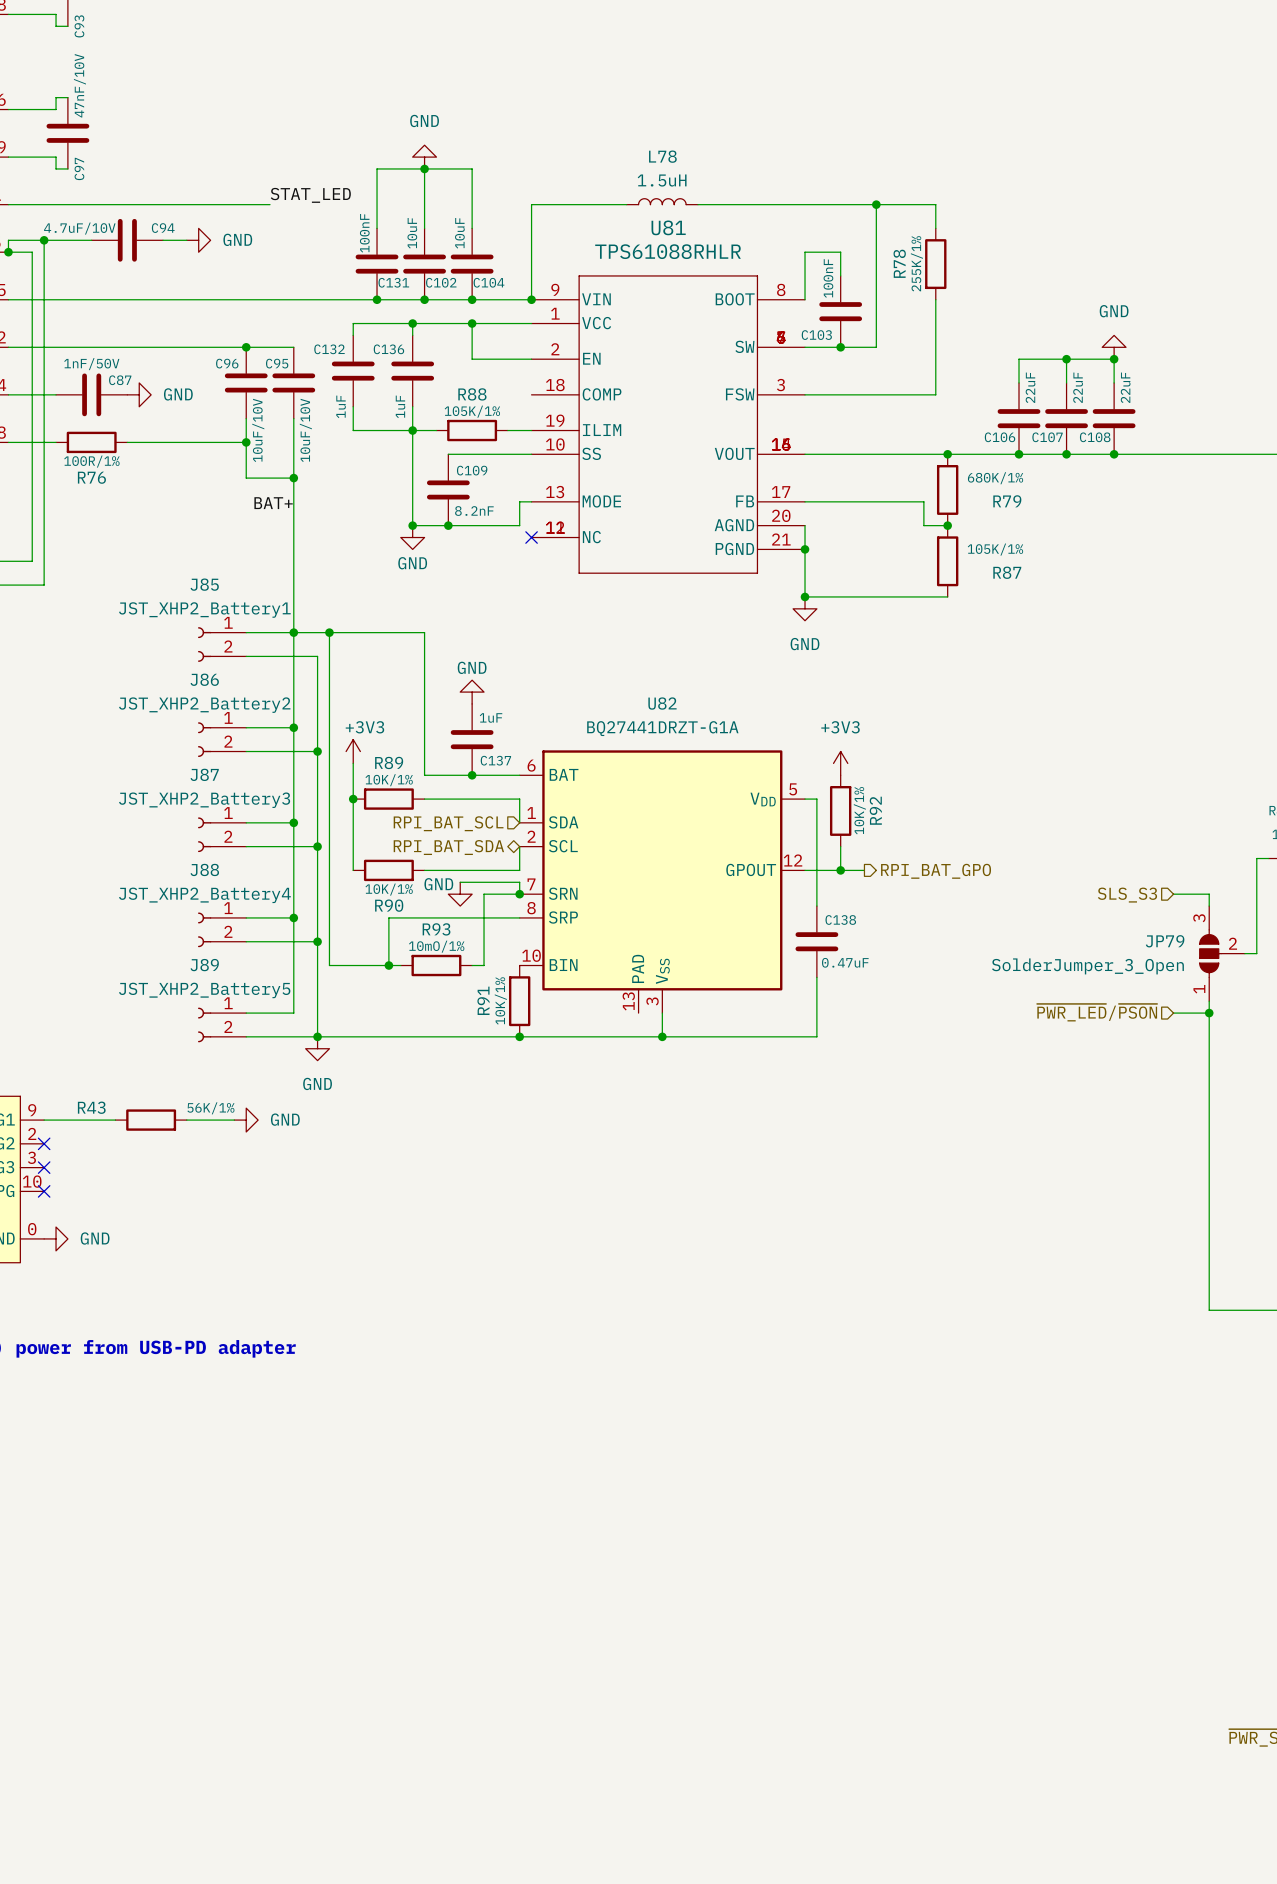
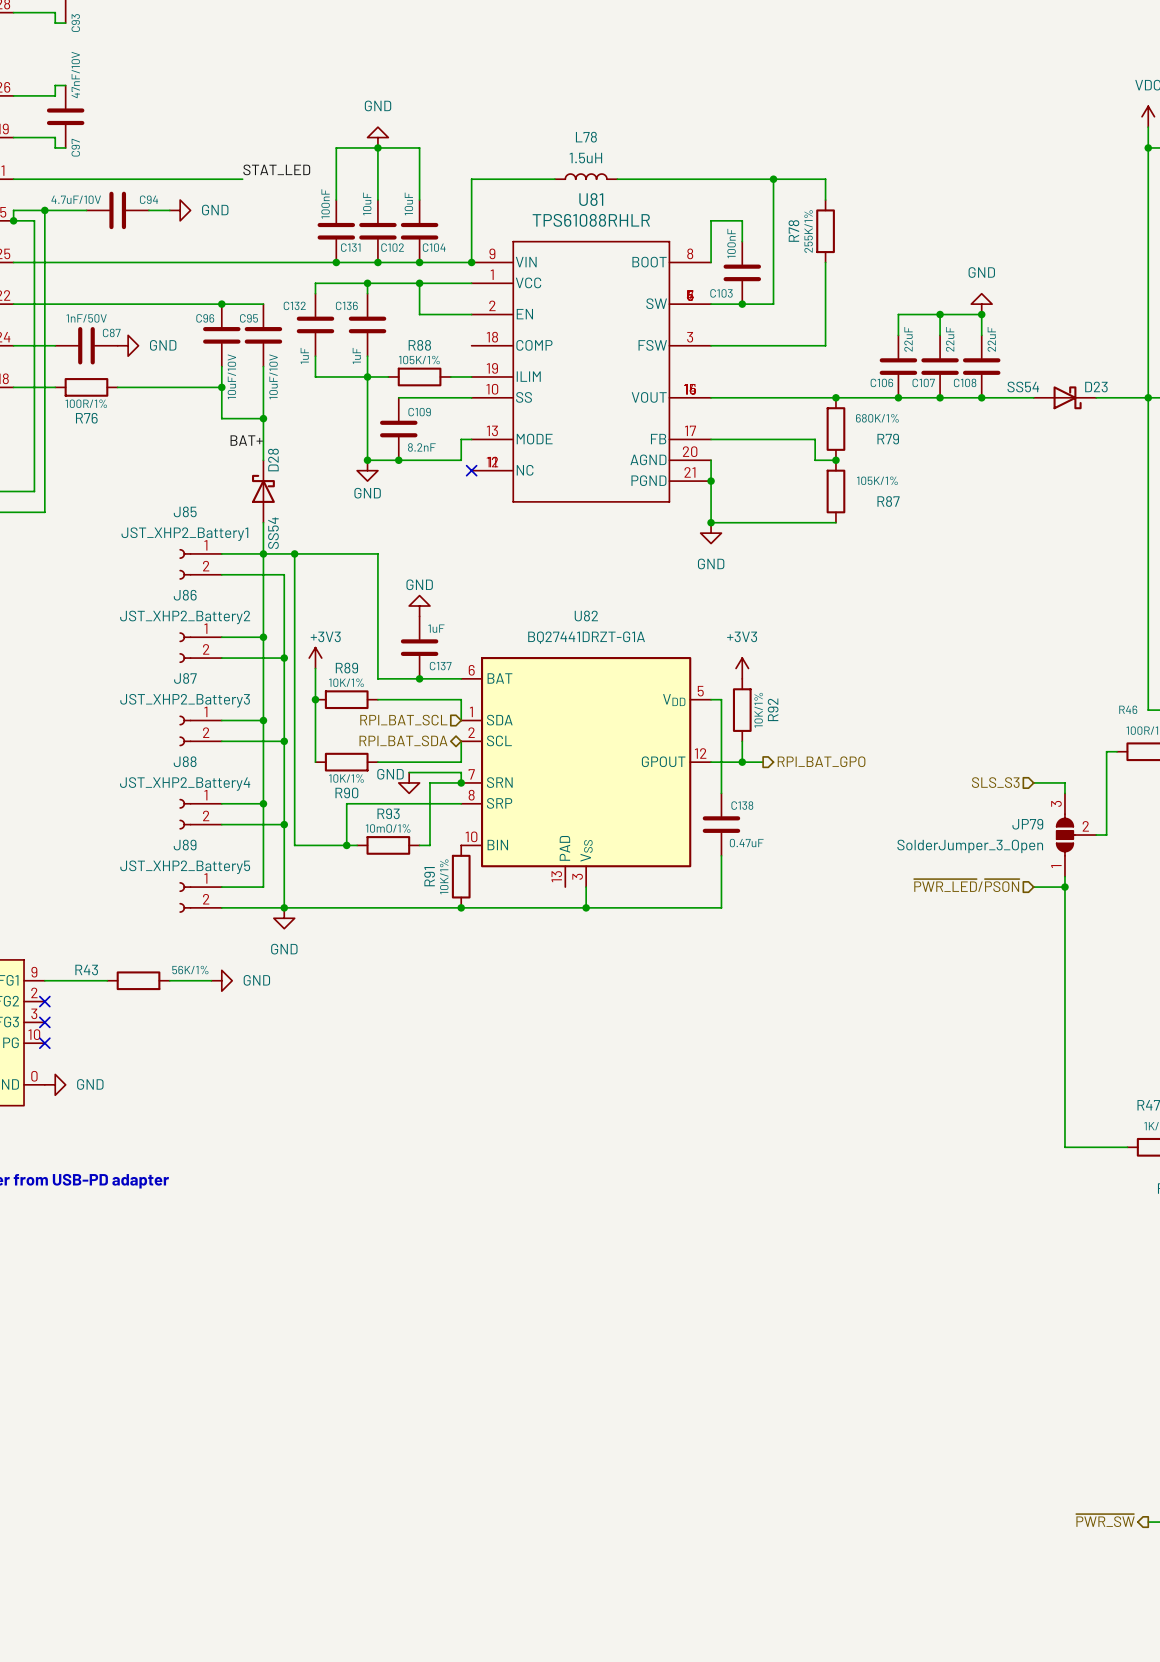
D23: none -> SS54 (1064, 397)
D28: none -> SS54 (263, 491)

